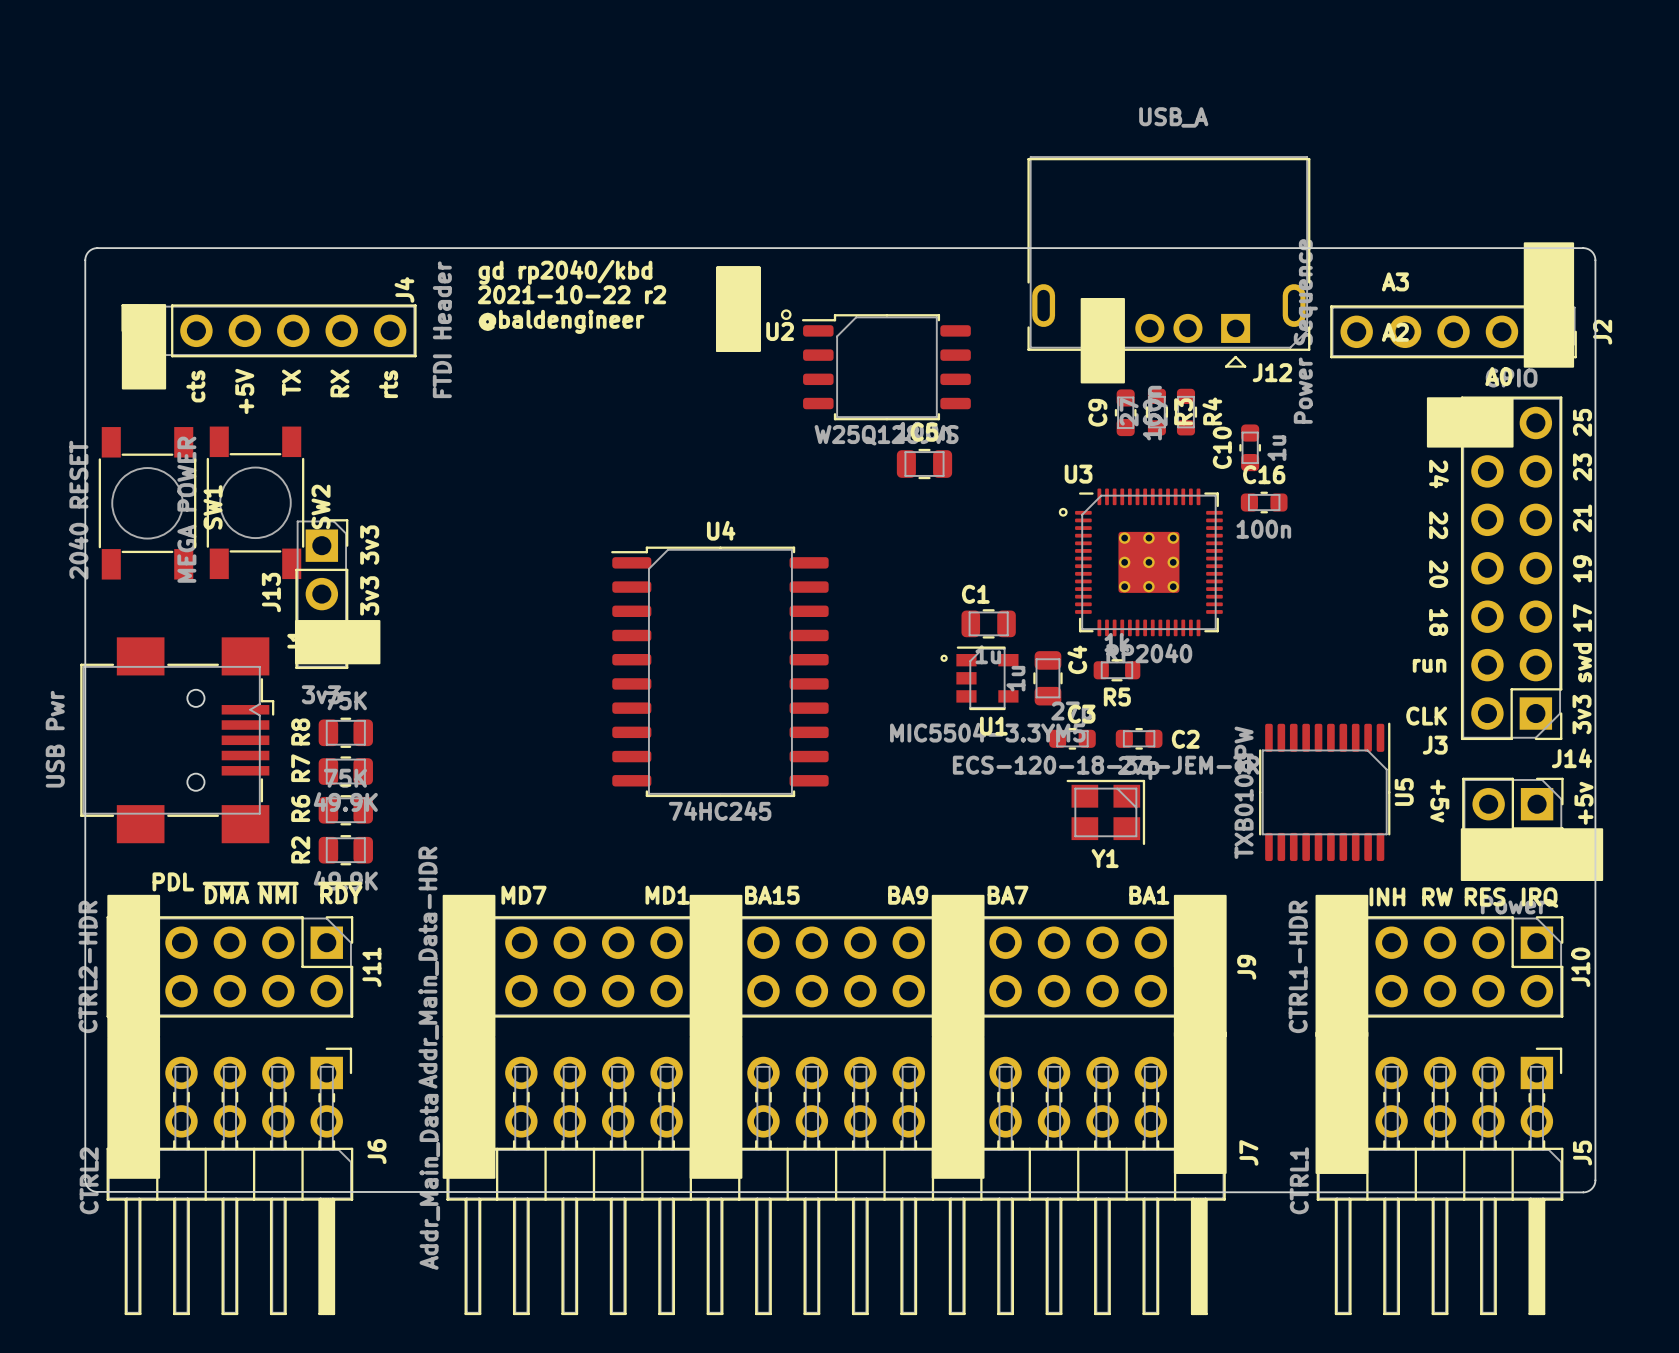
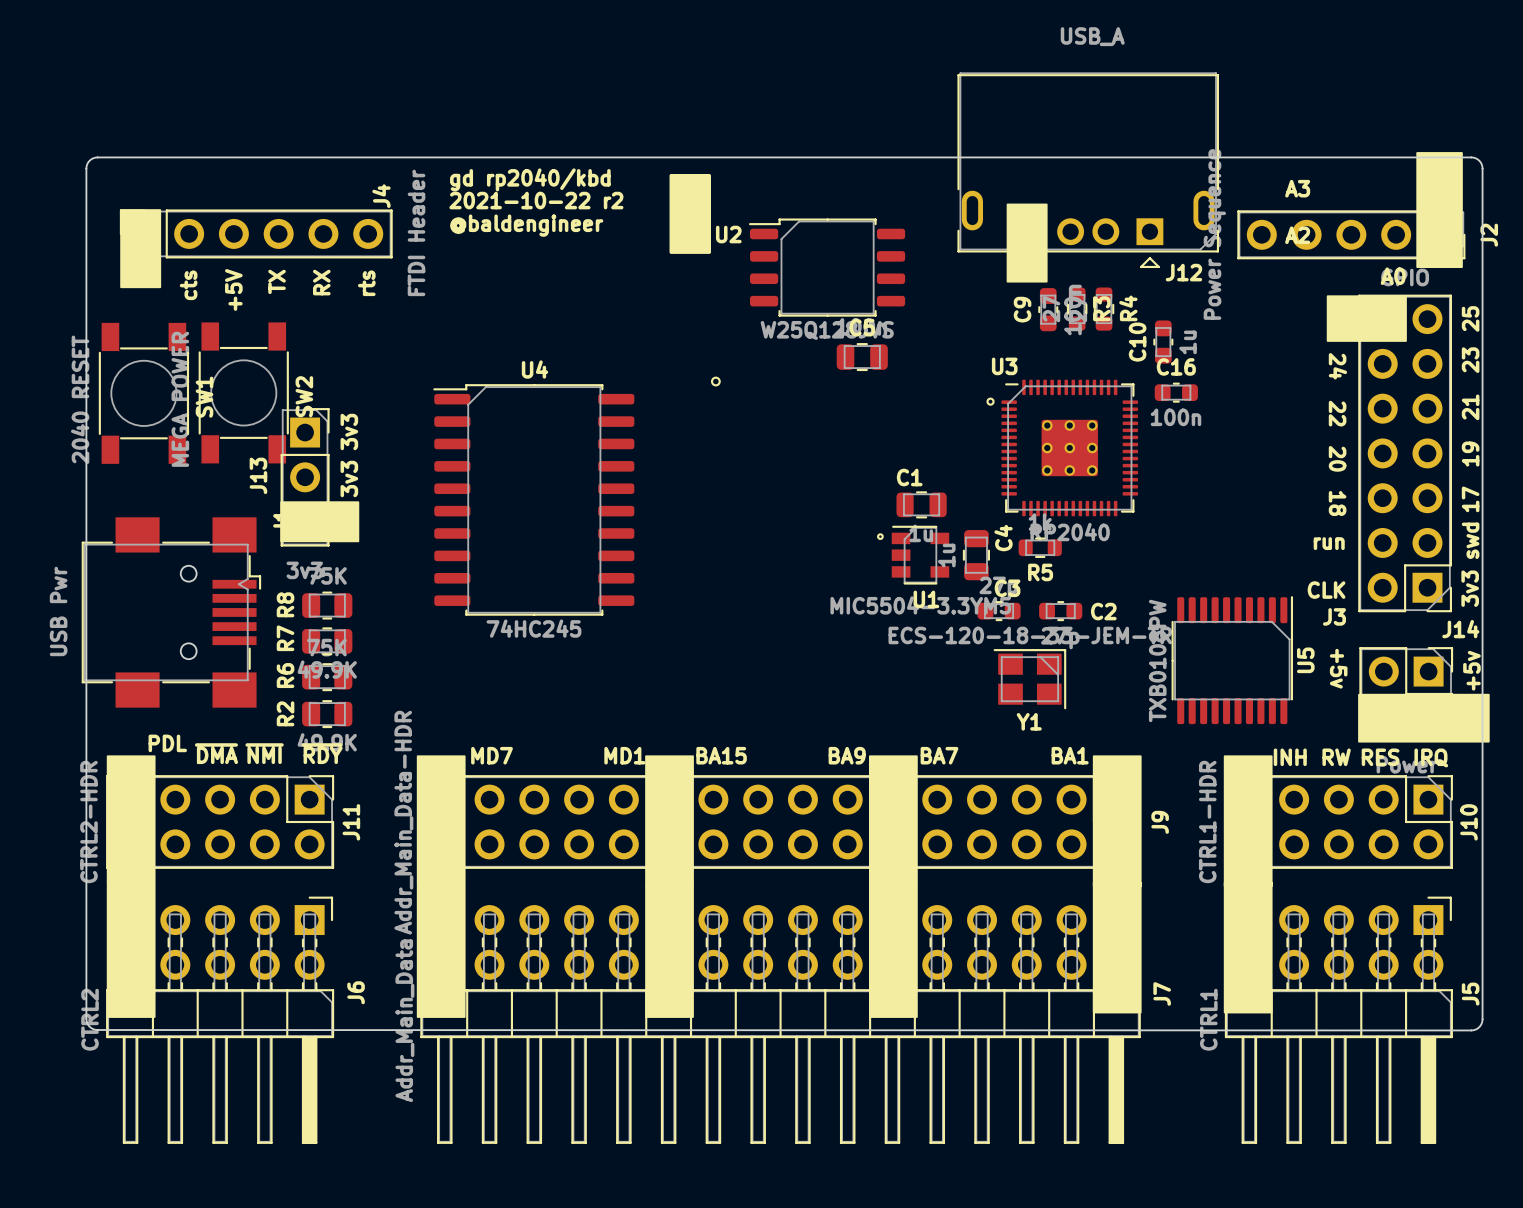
drawing position: (786, 314) -> (715, 381)
U4 position: (719, 671) -> (533, 499)

